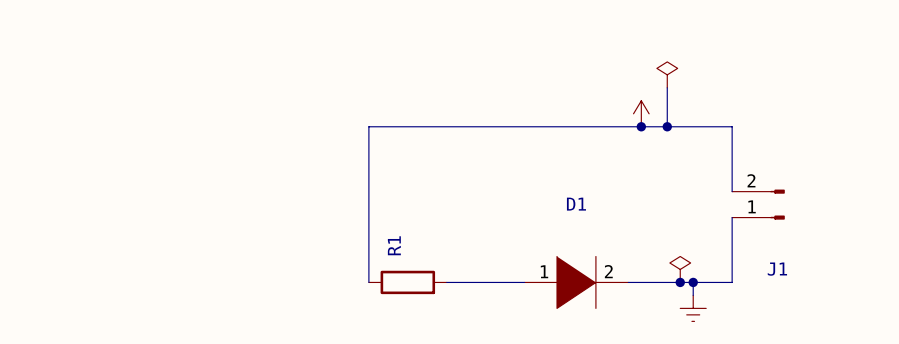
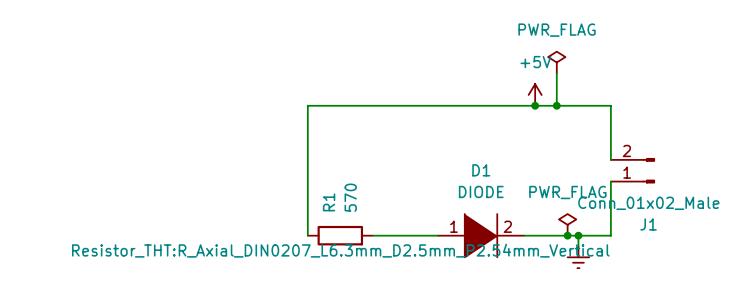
power symbol text: none -> PWR_FLAG (557, 30)
power symbol text: none -> +5V (535, 62)
D1 value: none -> DIODE (481, 191)
power symbol text: none -> PWR_FLAG (567, 192)
R1 value: none -> 570 (350, 197)
J1 value: none -> Conn_01x02_Male (648, 203)
R1 text: none -> Resistor_THT:R_Axial_DIN0207_L6.3mm_D2.5mm_P2.54mm_Vertical (340, 250)

